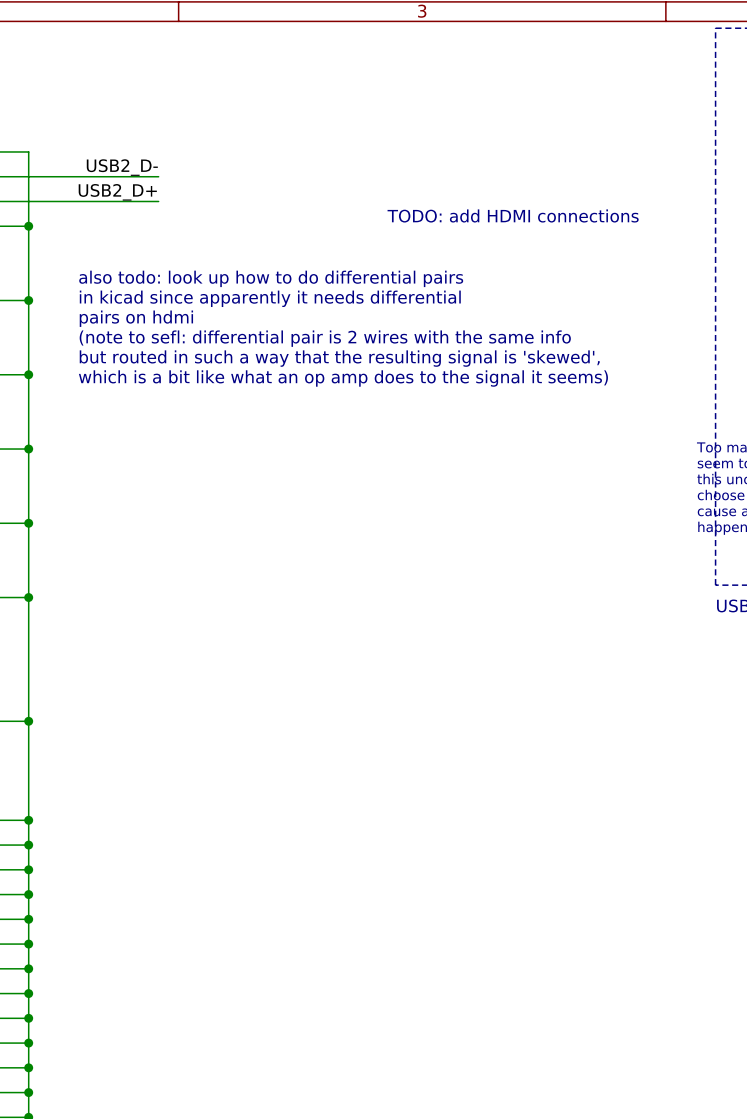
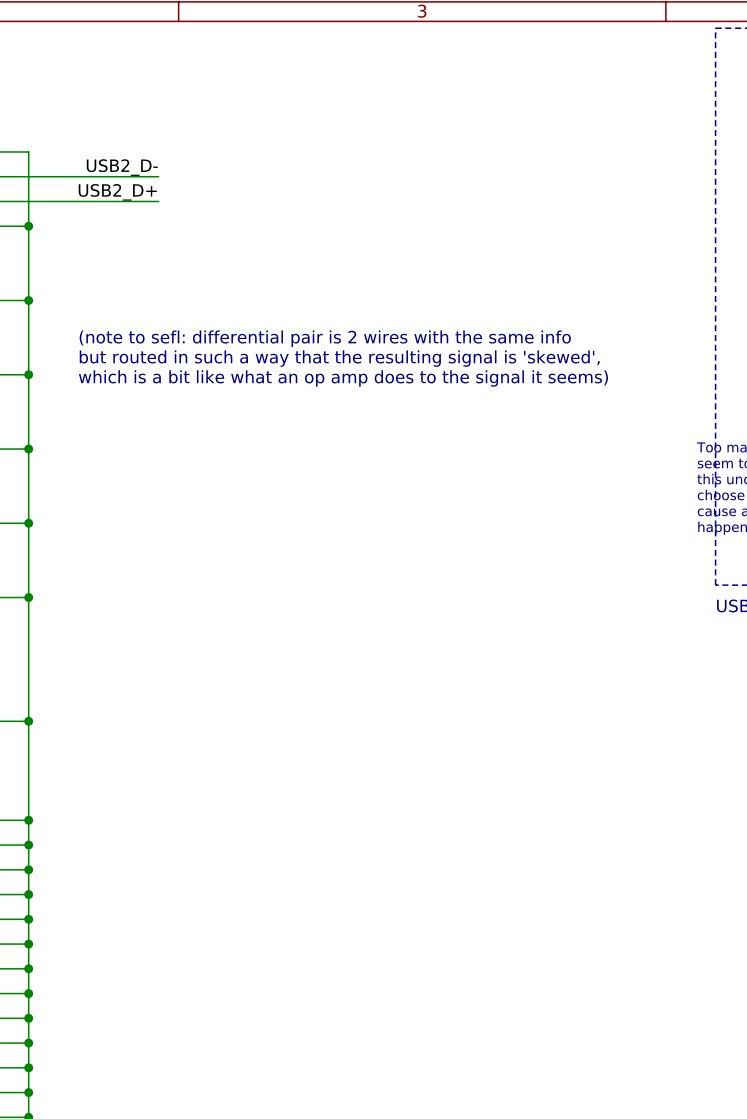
text: TODO: add HDMI connections (513, 215) -> none
text: also todo: look up how to do differential pairs (271, 278) -> none
text: in kicad since apparently it needs differential (270, 298) -> none
text: pairs on hdmi (136, 318) -> none

